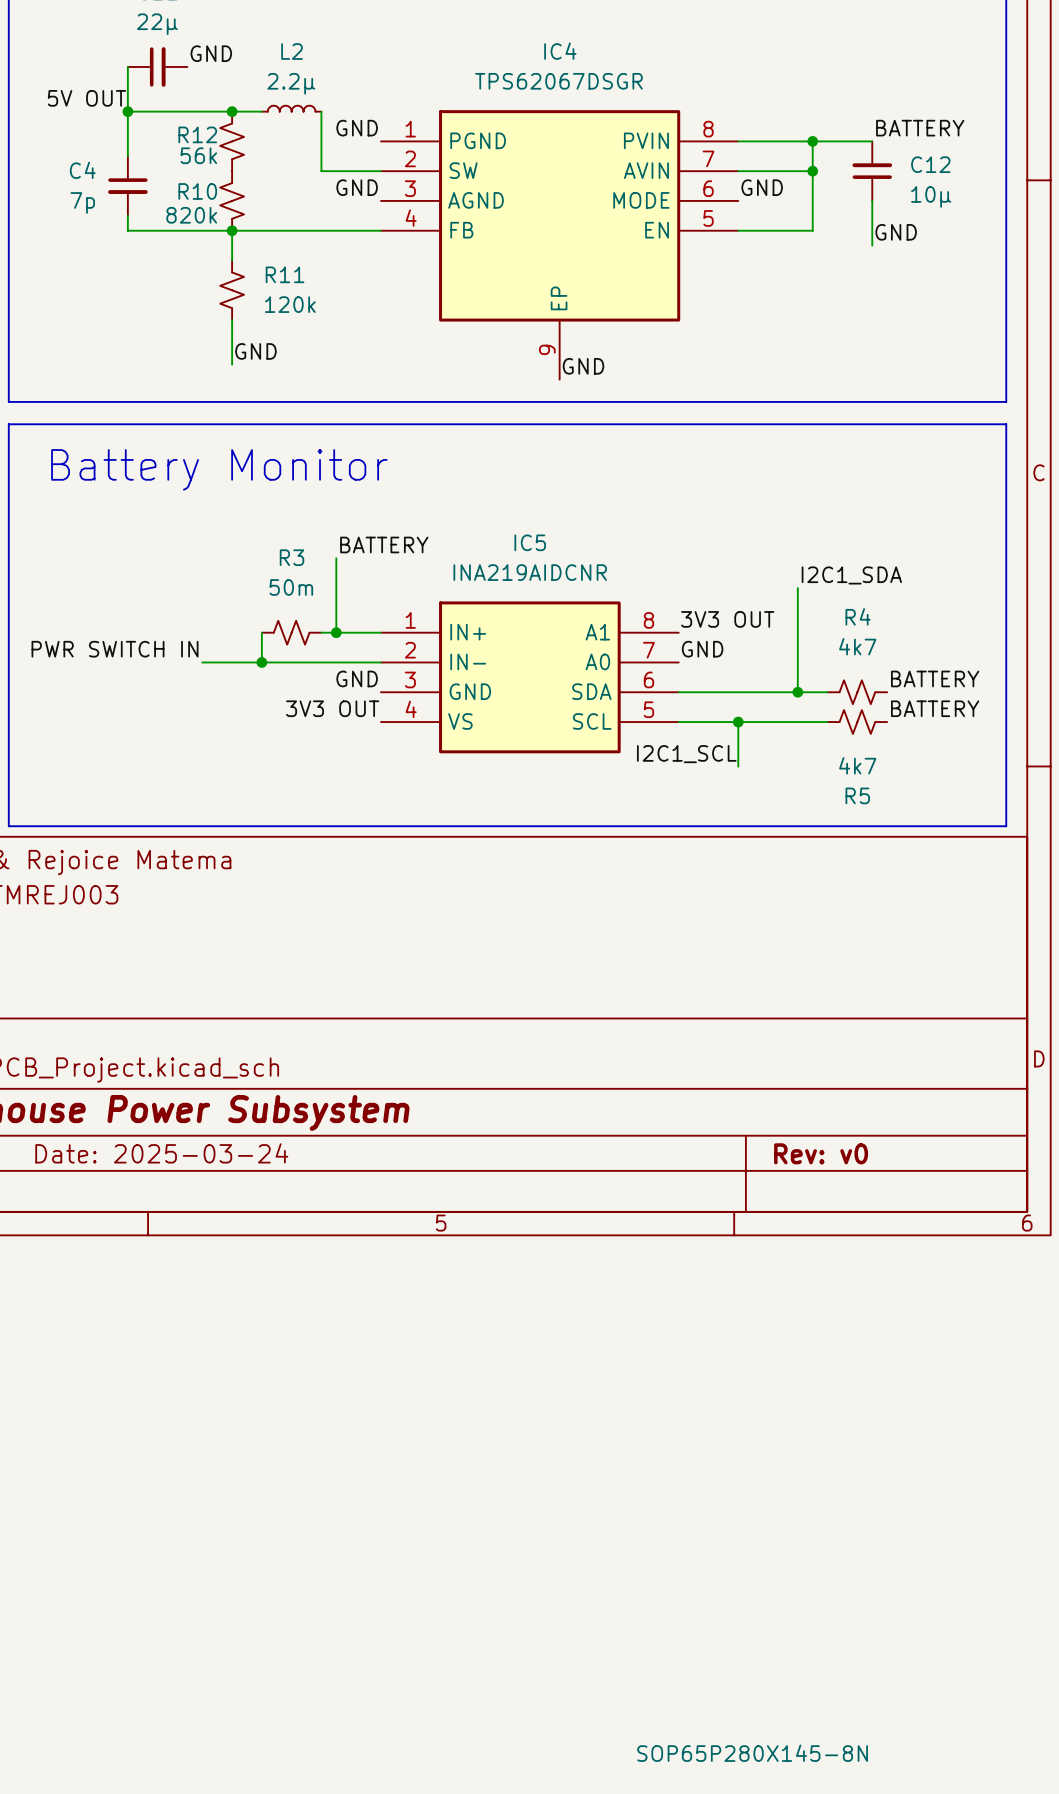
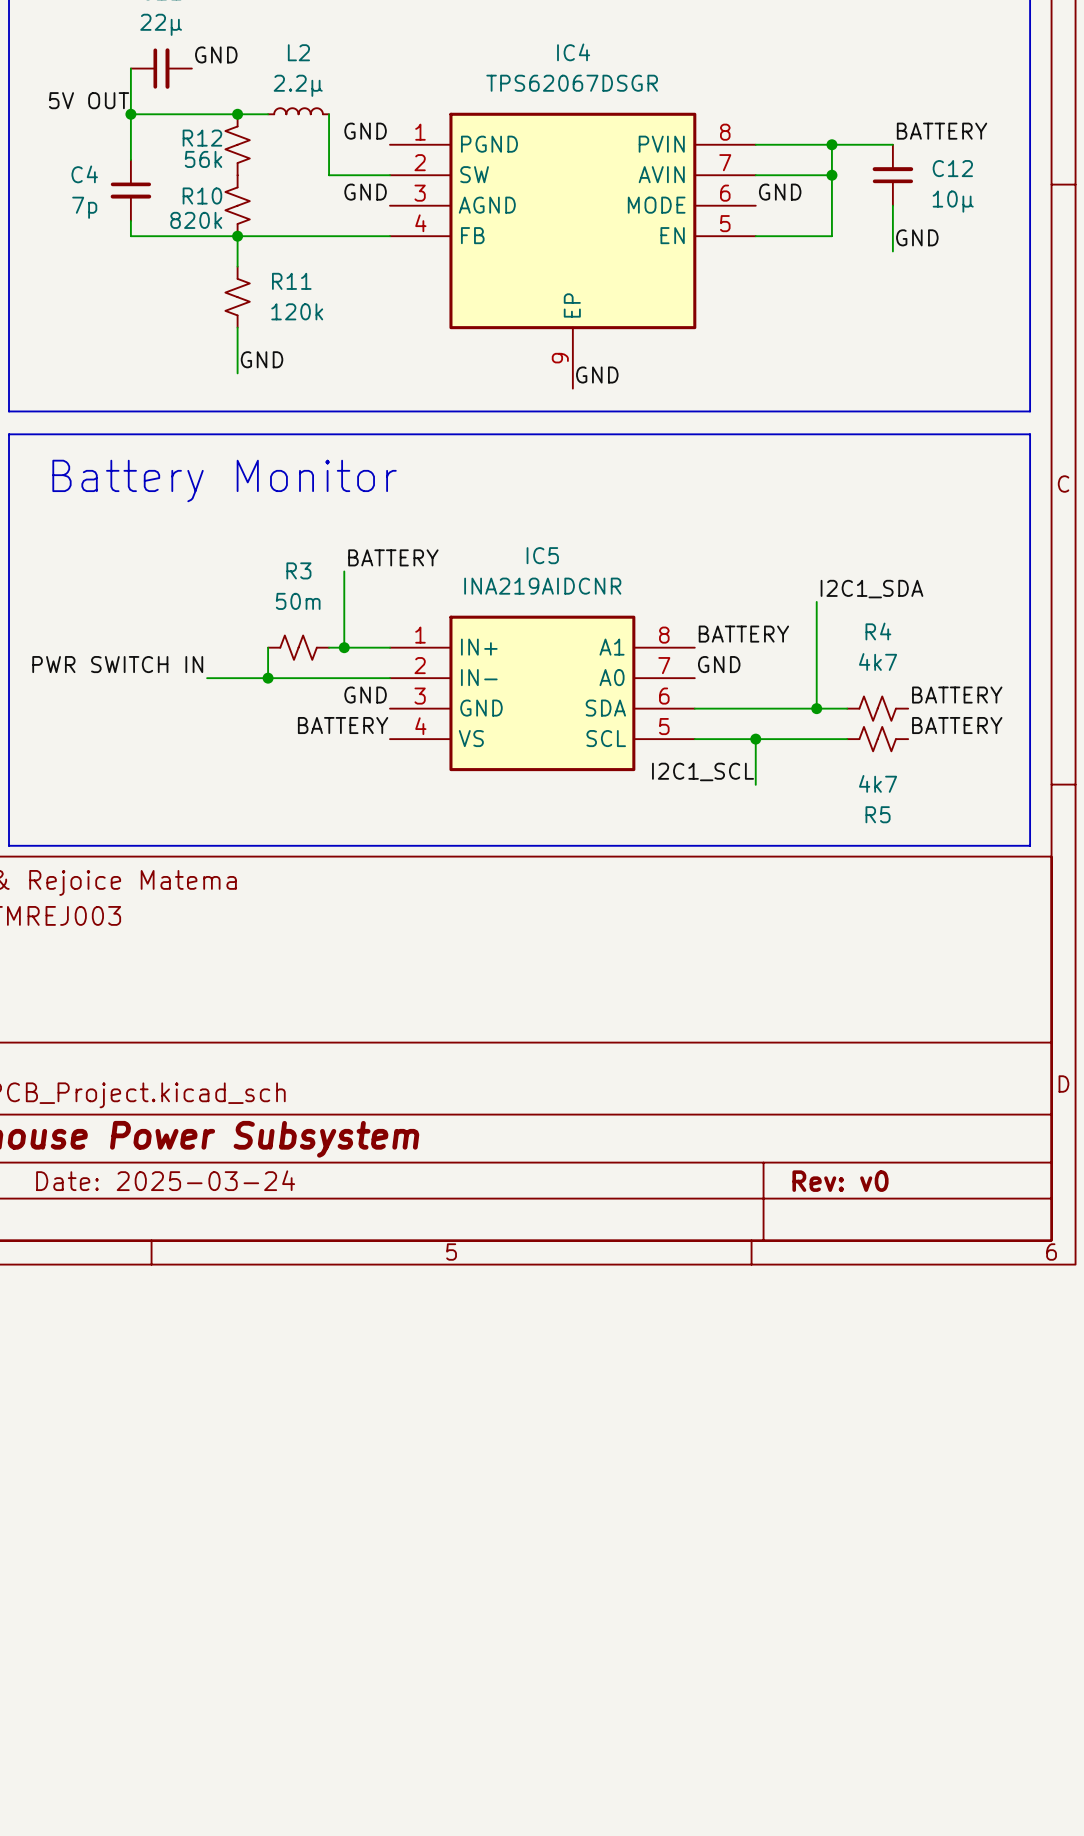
label: 3V3 OUT (727, 619) -> BATTERY (743, 634)
label: 3V3 OUT (332, 708) -> BATTERY (343, 725)
IC5 text: SOP65P280X145-8N (752, 1753) -> none

